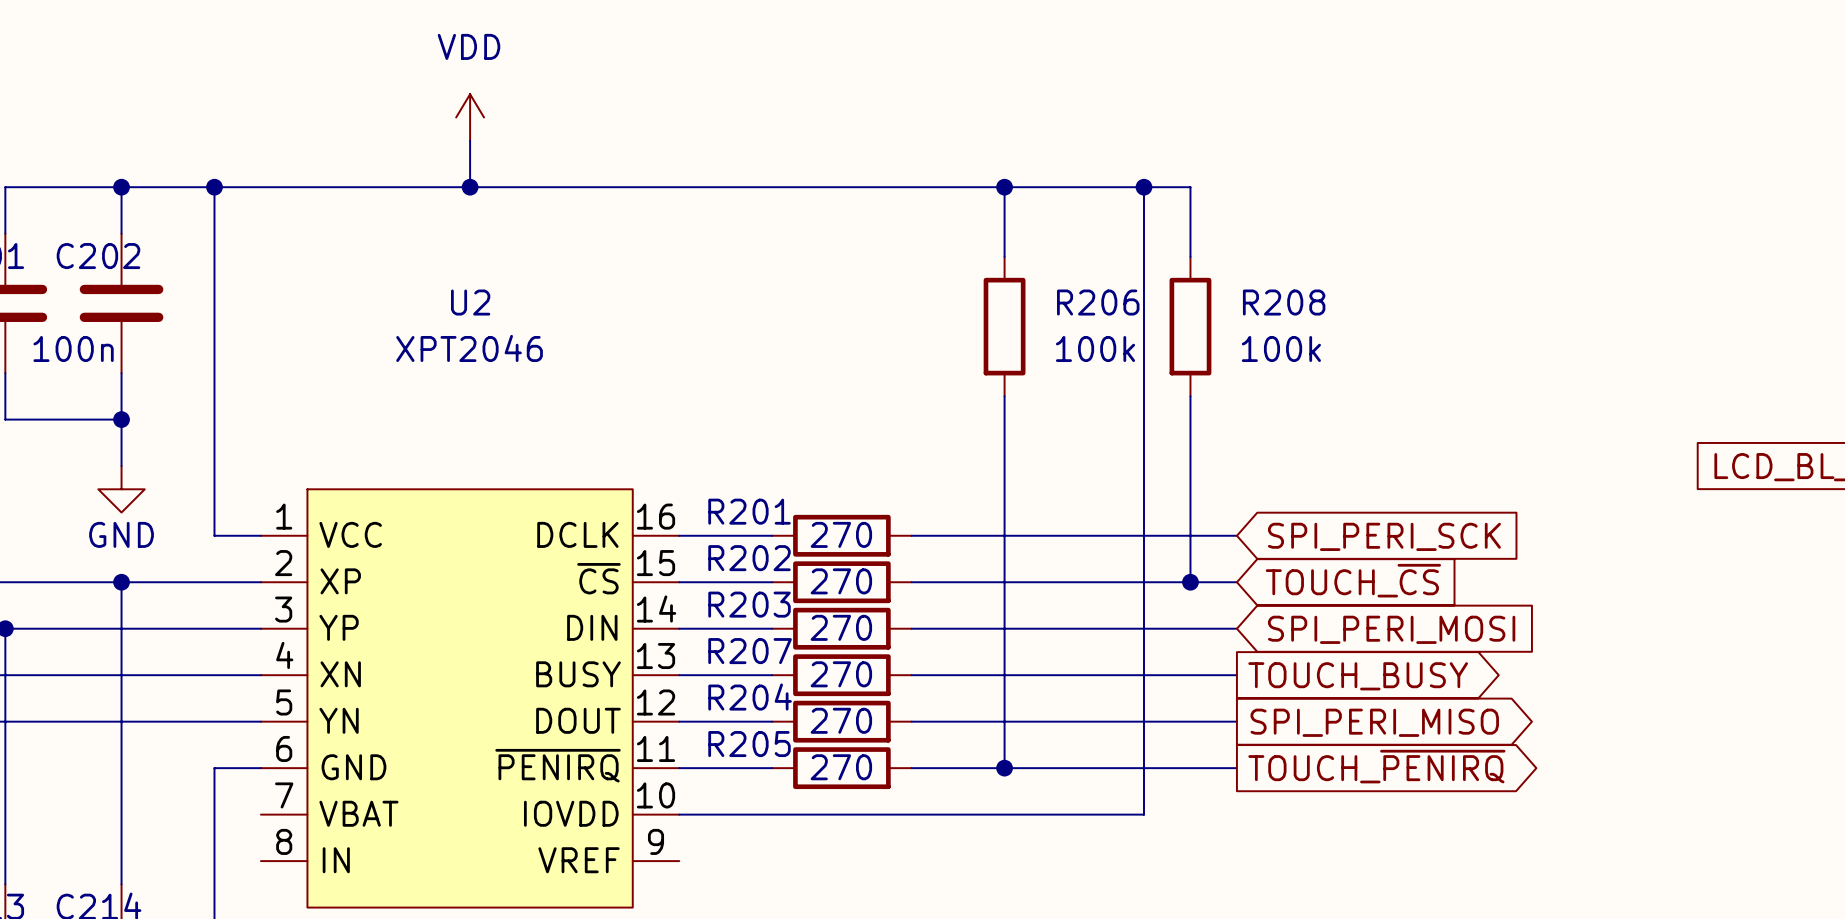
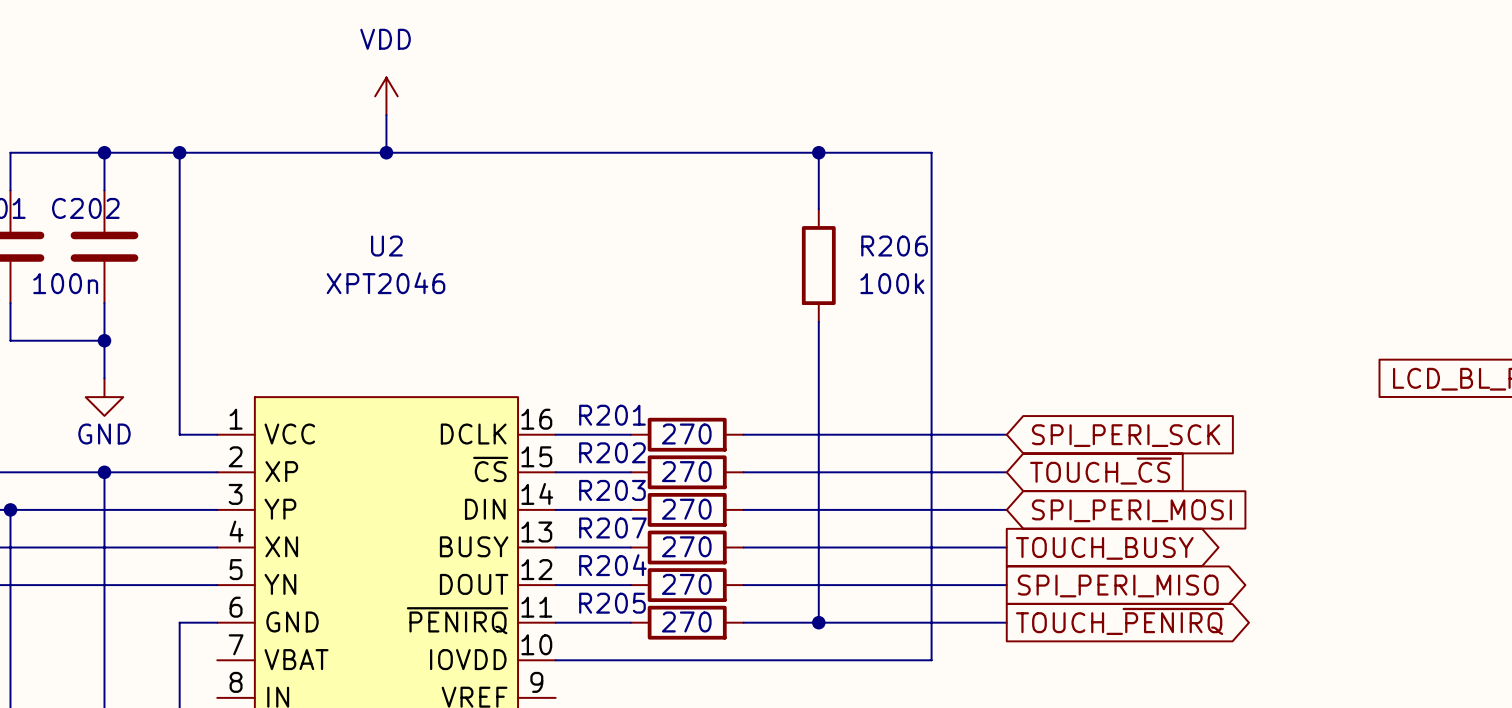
wire: (1143, 187) (1190, 187) (1190, 256) -> none
junction: (1143, 187) -> none
R208: 100k (1190, 326) -> none
wire: (1190, 396) (1190, 582) -> none
junction: (1190, 582) -> none

